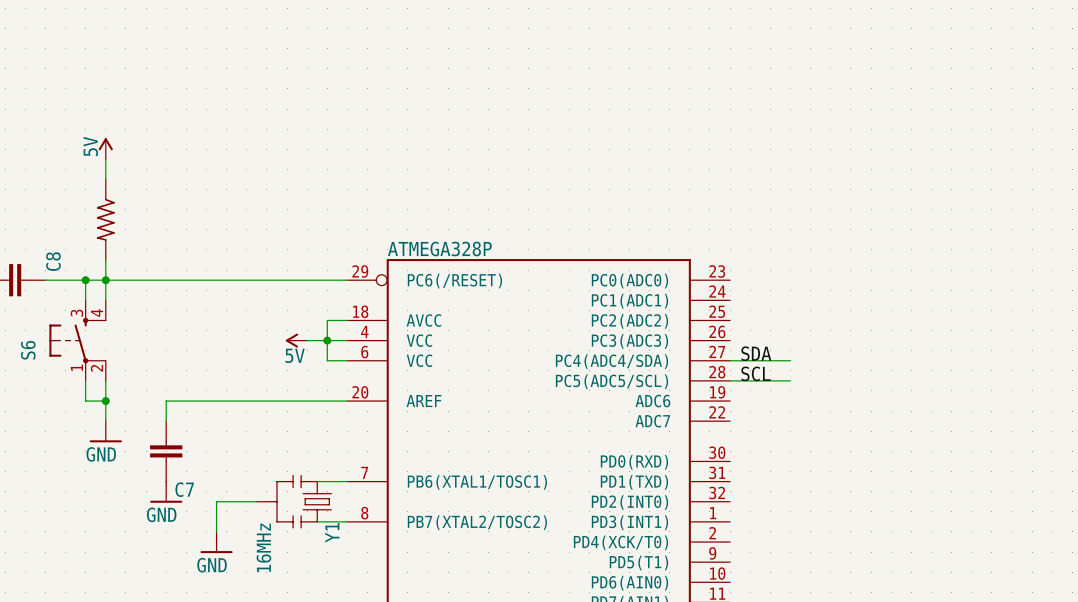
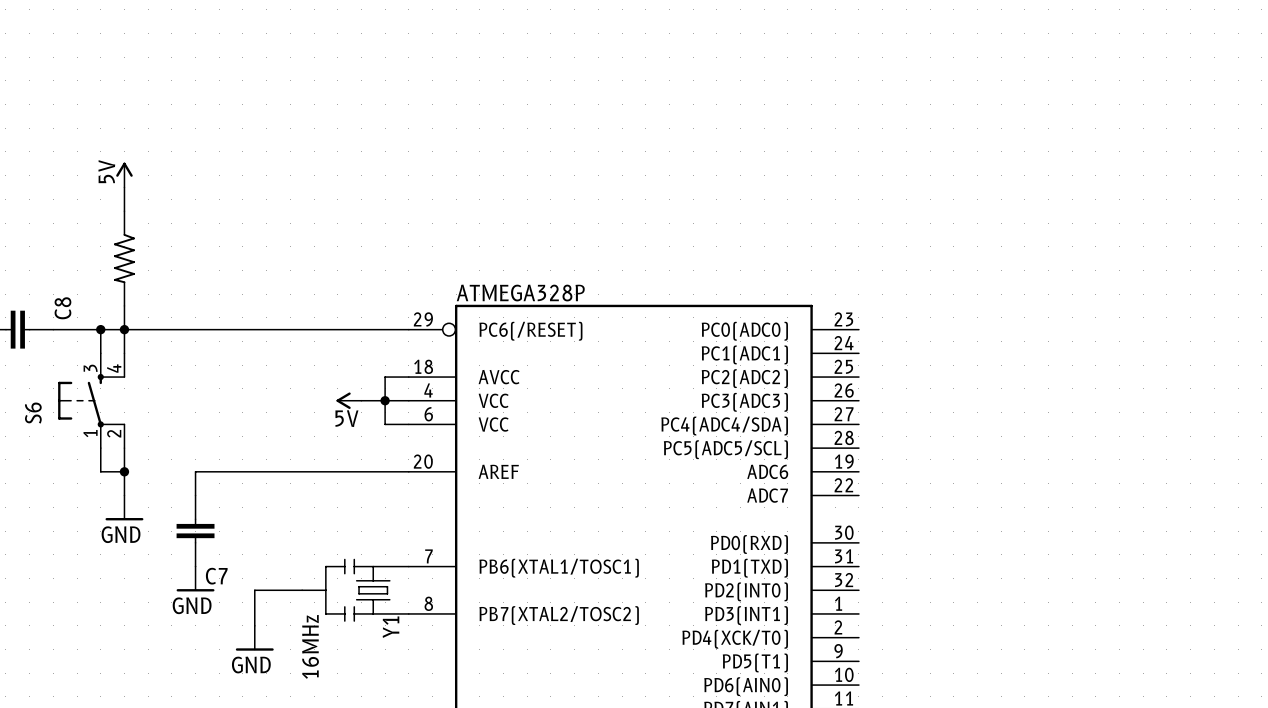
label: SDA (756, 353) -> none
wire: (730, 360) (790, 360) -> none
label: SCL (756, 373) -> none
wire: (730, 380) (790, 380) -> none

